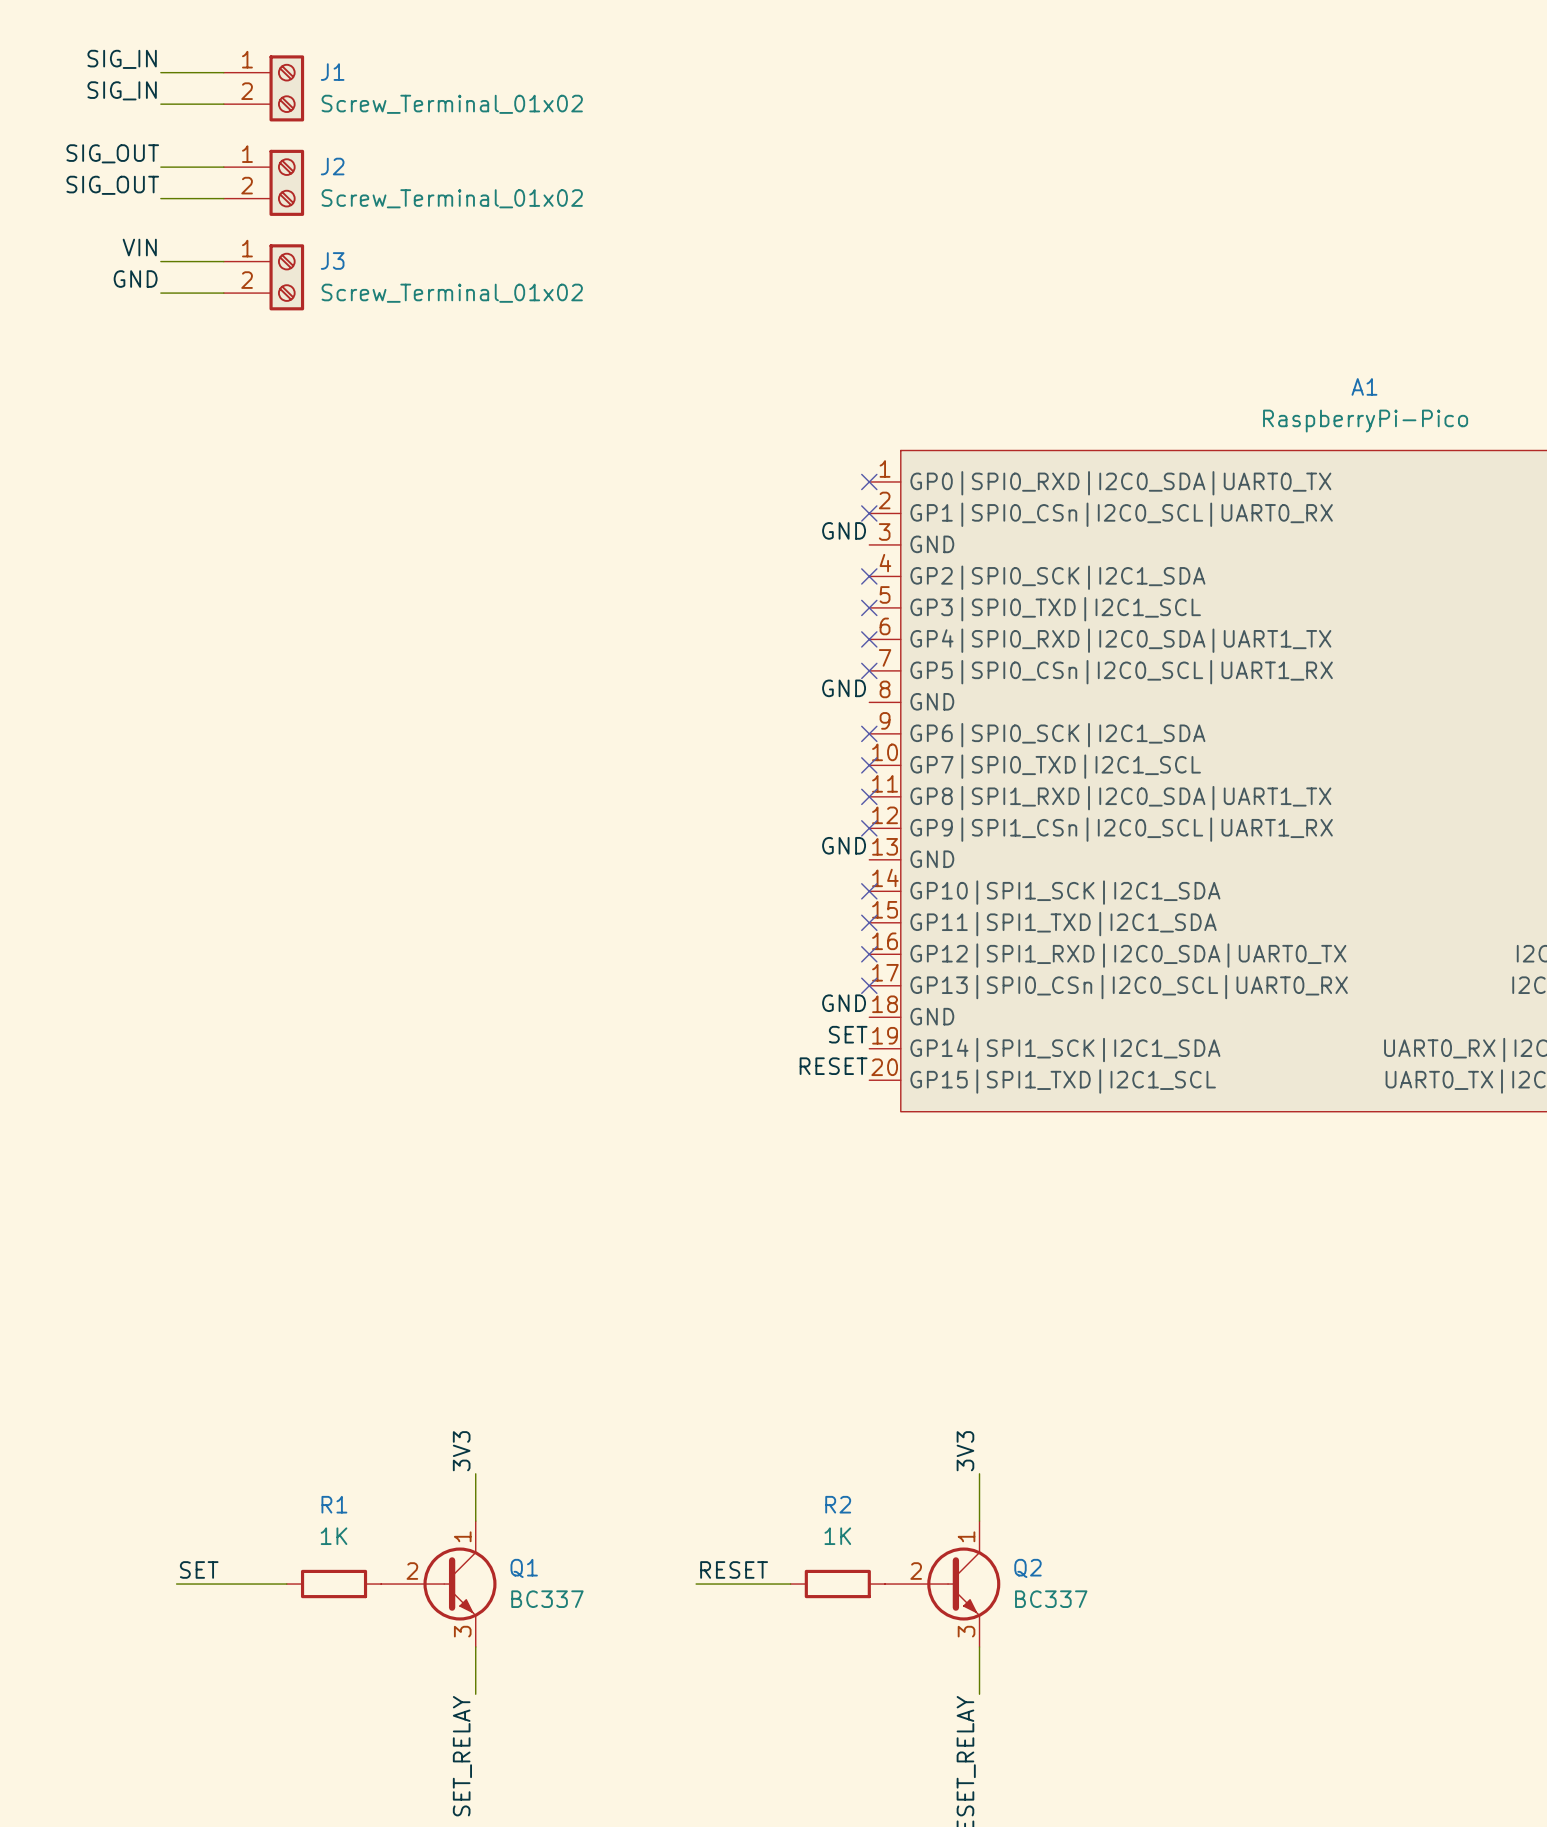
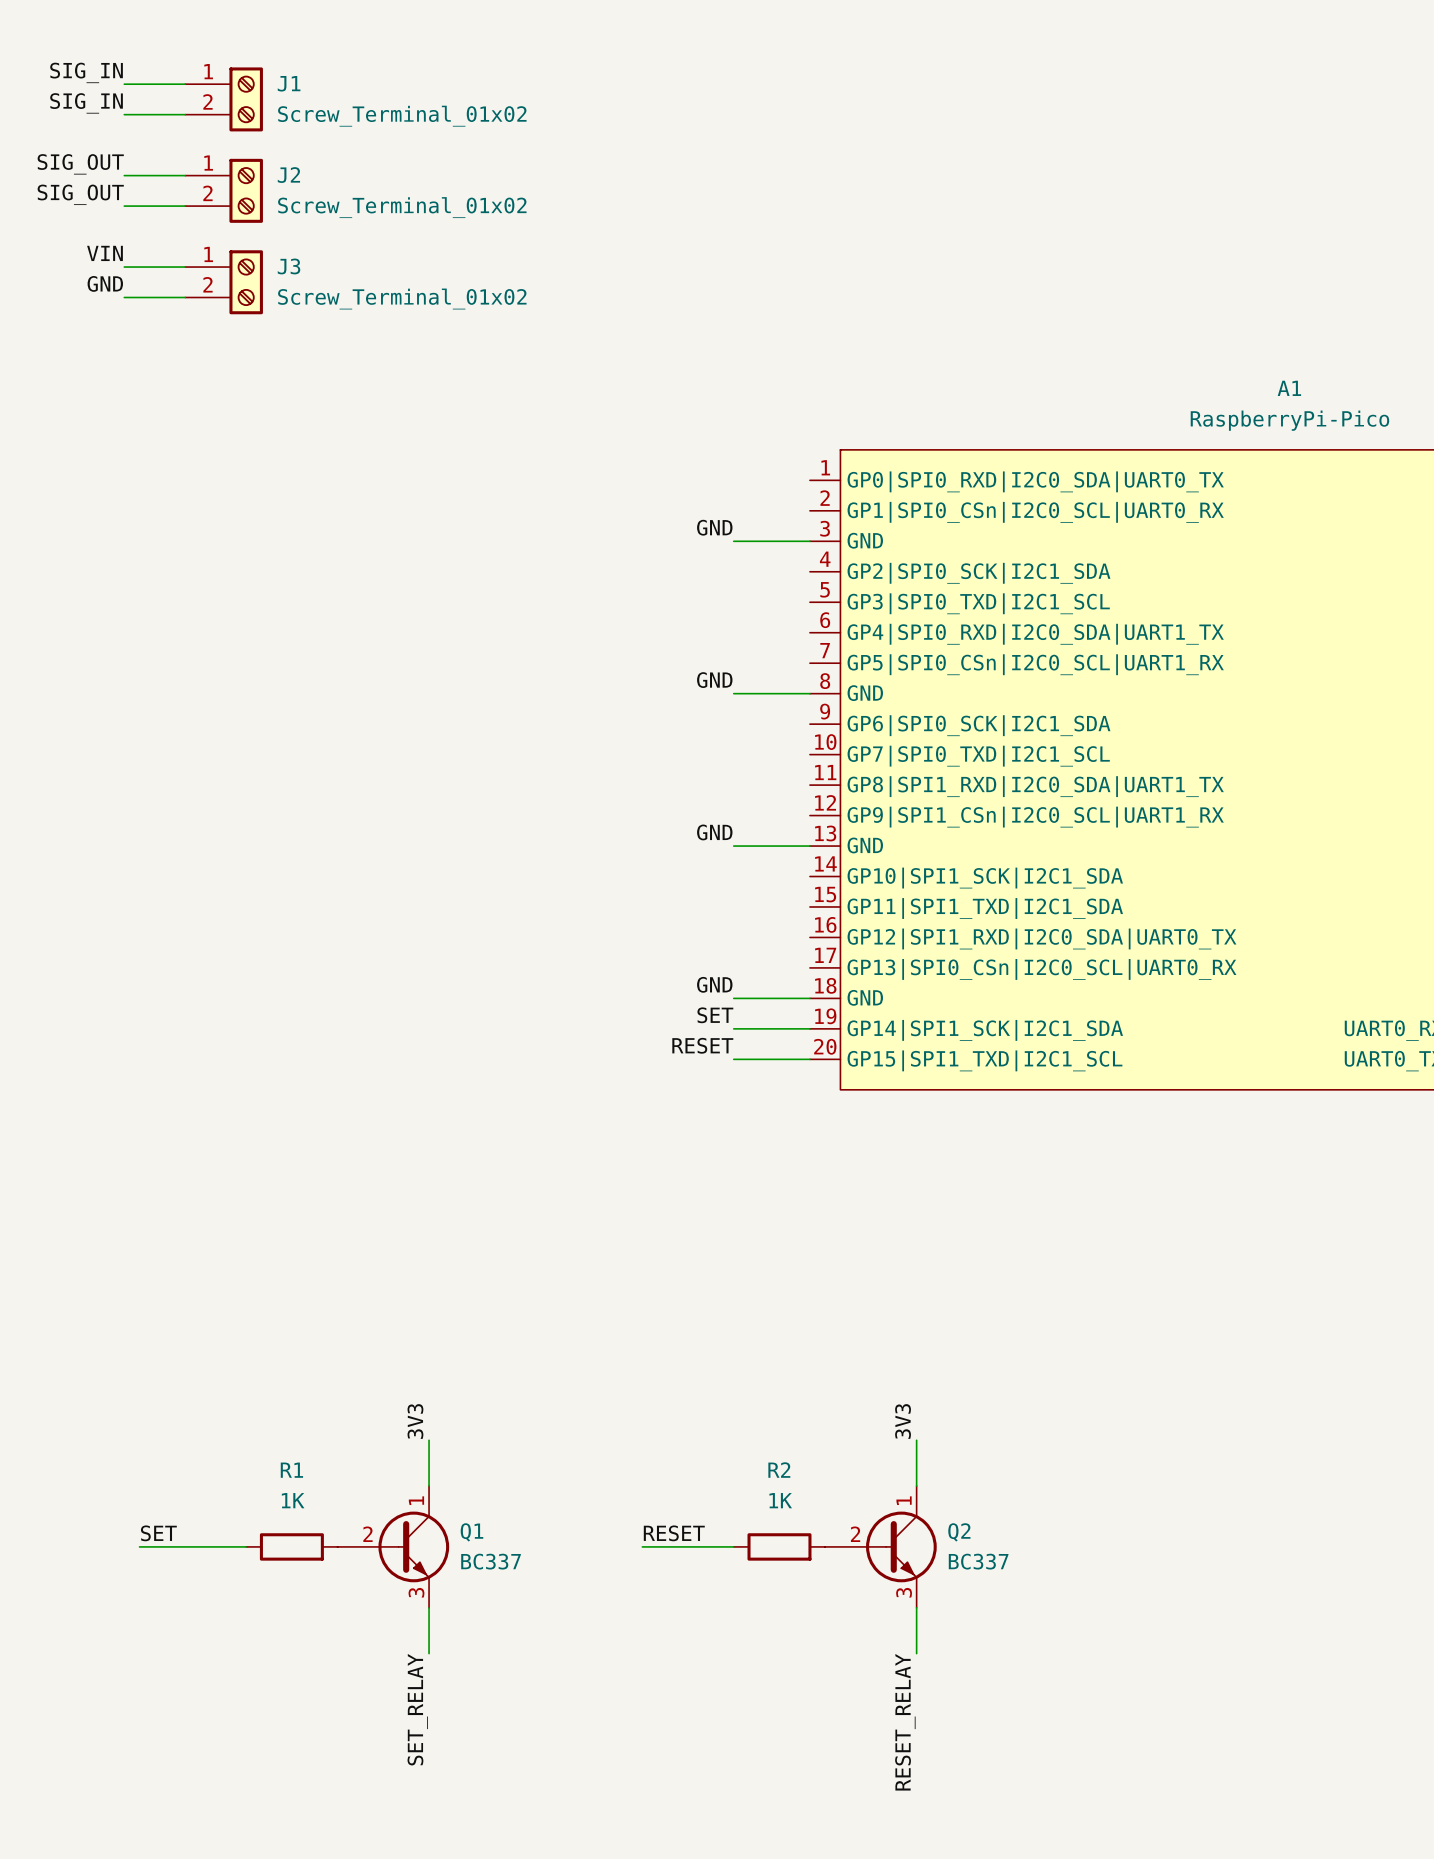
no-connect mark: (869, 481) -> none
no-connect mark: (869, 513) -> none
label position: GND (844, 530) -> GND (714, 527)
wire: none -> (733, 541) (809, 541)
no-connect mark: (869, 576) -> none
no-connect mark: (869, 607) -> none
no-connect mark: (869, 639) -> none
no-connect mark: (869, 670) -> none
label position: GND (844, 688) -> GND (714, 680)
wire: none -> (733, 693) (809, 693)
no-connect mark: (869, 733) -> none
no-connect mark: (869, 765) -> none
no-connect mark: (869, 796) -> none
no-connect mark: (869, 828) -> none
label position: GND (844, 845) -> GND (714, 832)
wire: none -> (733, 846) (809, 846)
no-connect mark: (869, 891) -> none
no-connect mark: (869, 922) -> none
no-connect mark: (869, 954) -> none
no-connect mark: (869, 985) -> none
label position: GND (844, 1003) -> GND (714, 984)
wire: none -> (733, 998) (809, 998)
label position: SET (848, 1034) -> SET (715, 1015)
wire: none -> (733, 1028) (809, 1028)
label position: RESET (833, 1066) -> RESET (702, 1045)
wire: none -> (733, 1059) (809, 1059)

